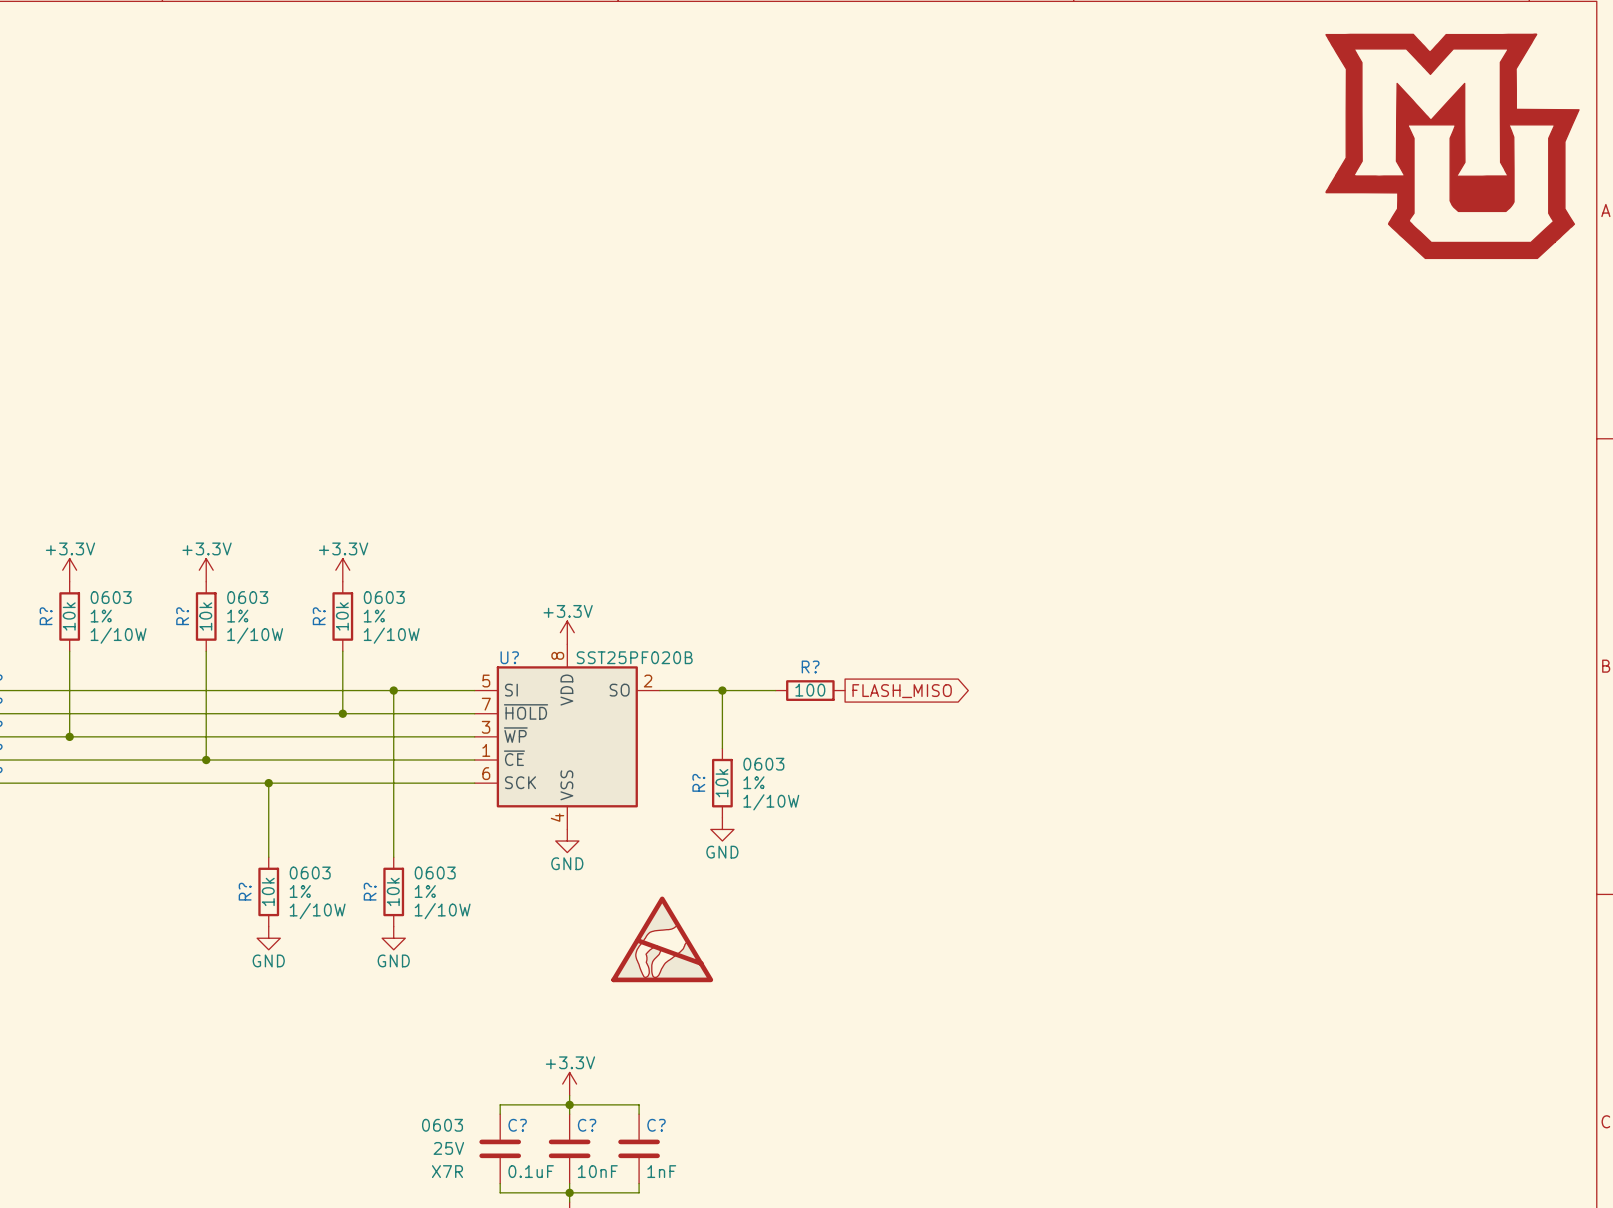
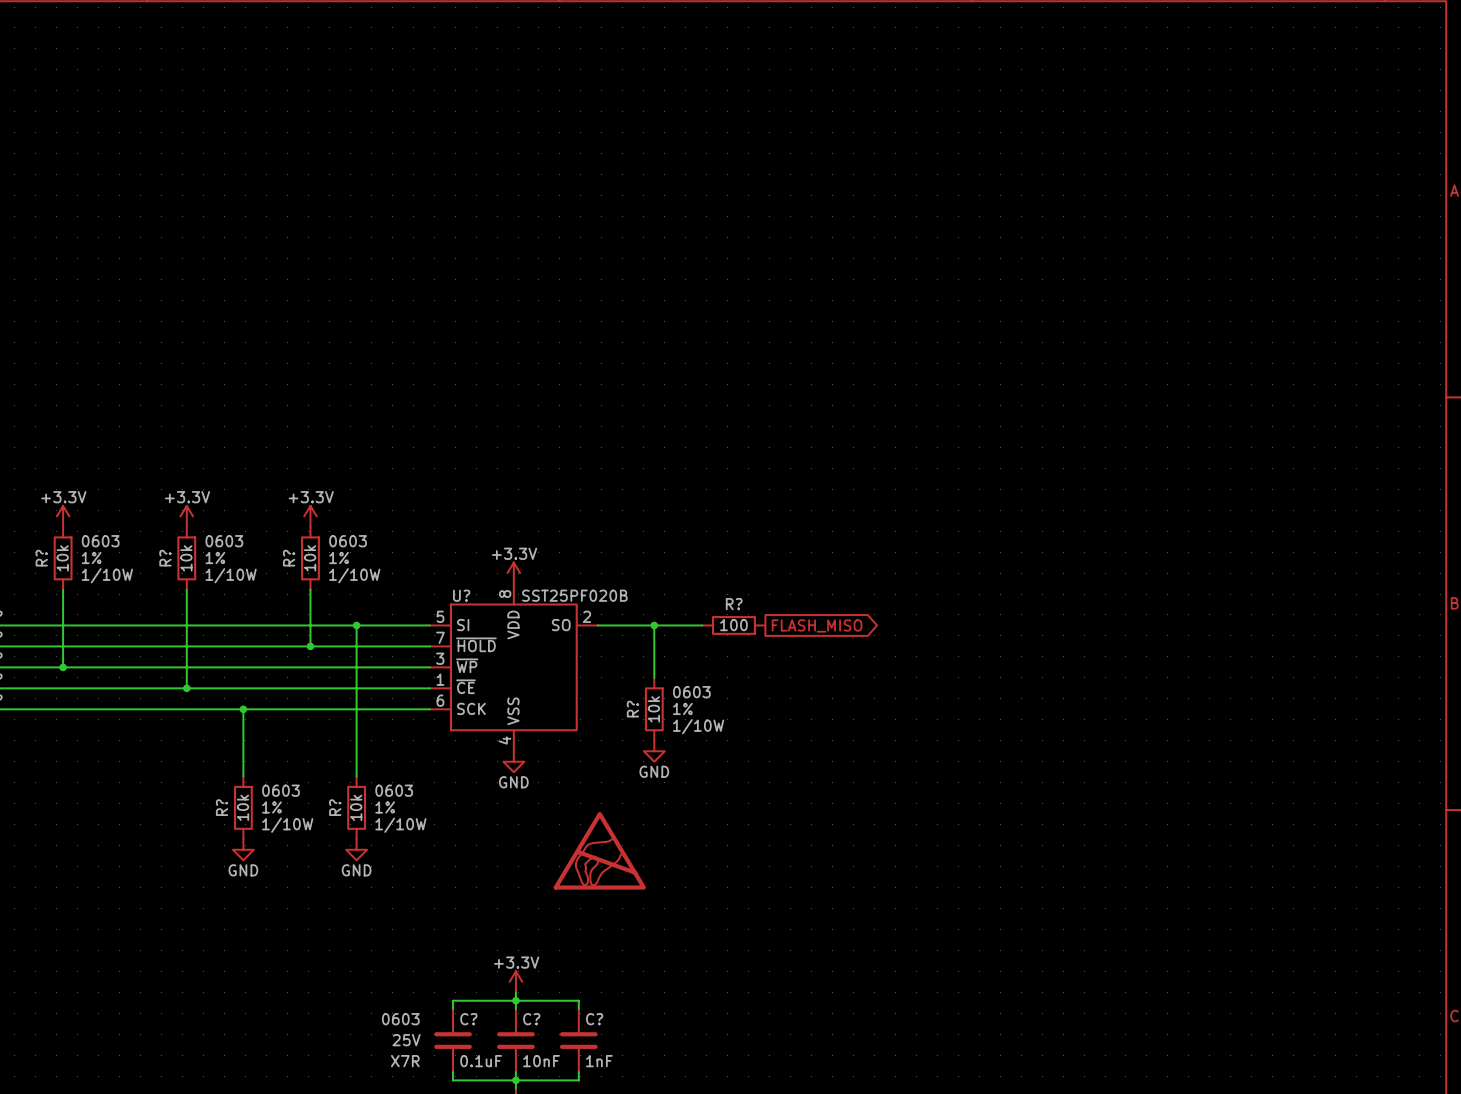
power symbol: (1452, 146) -> none

